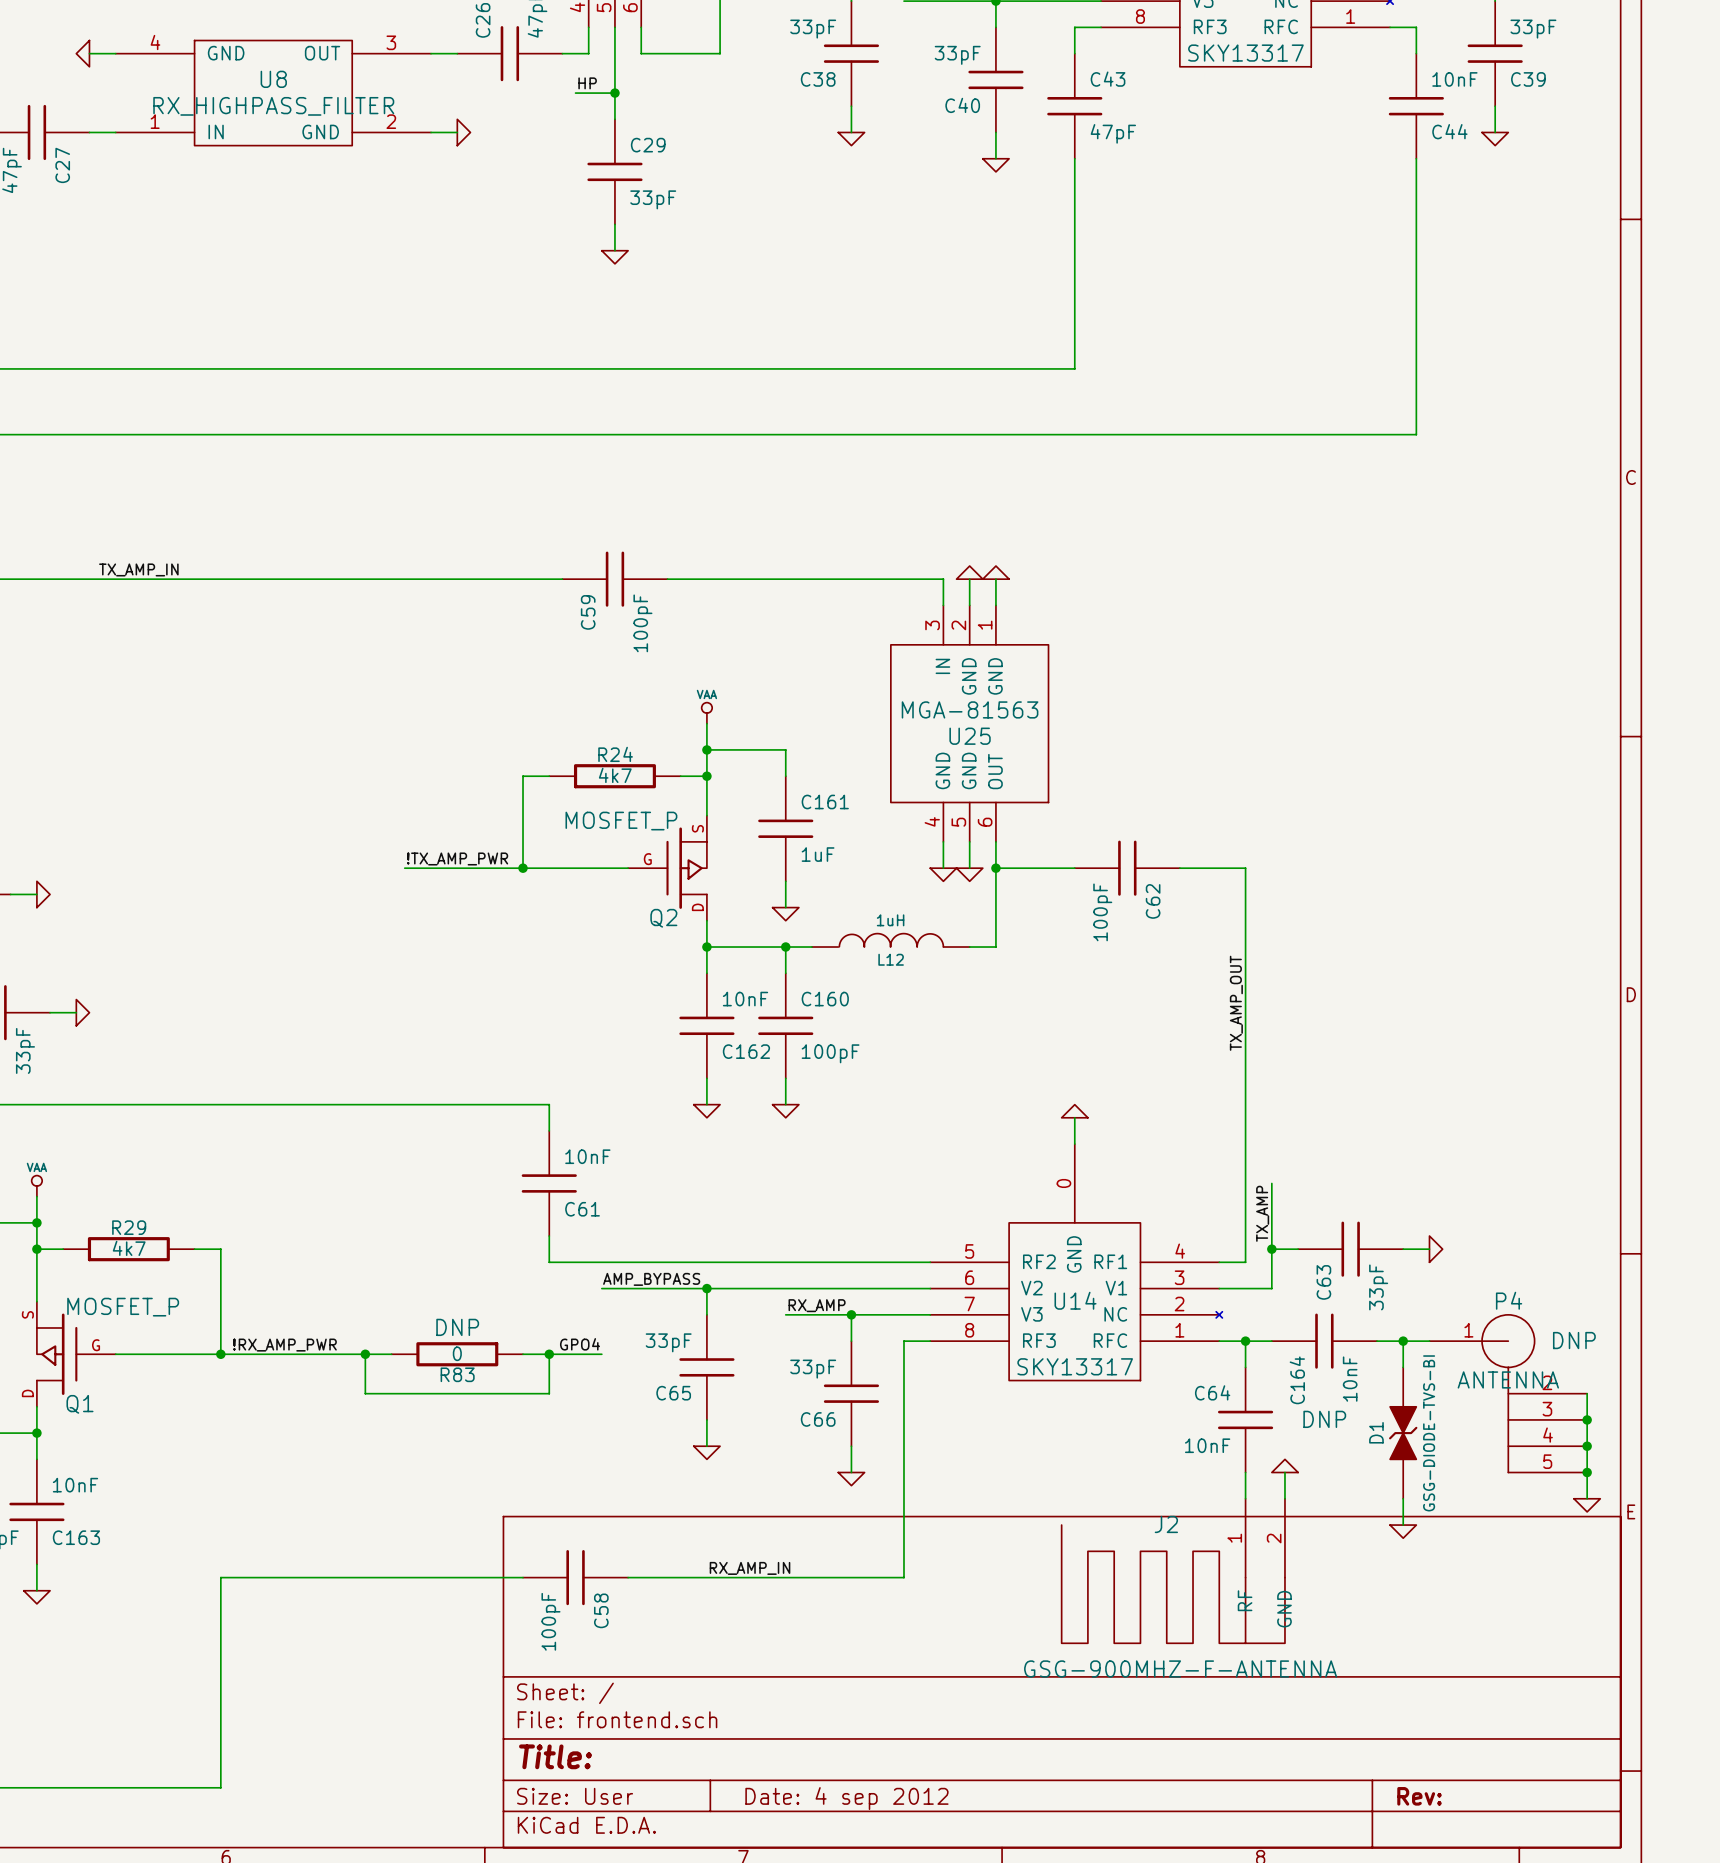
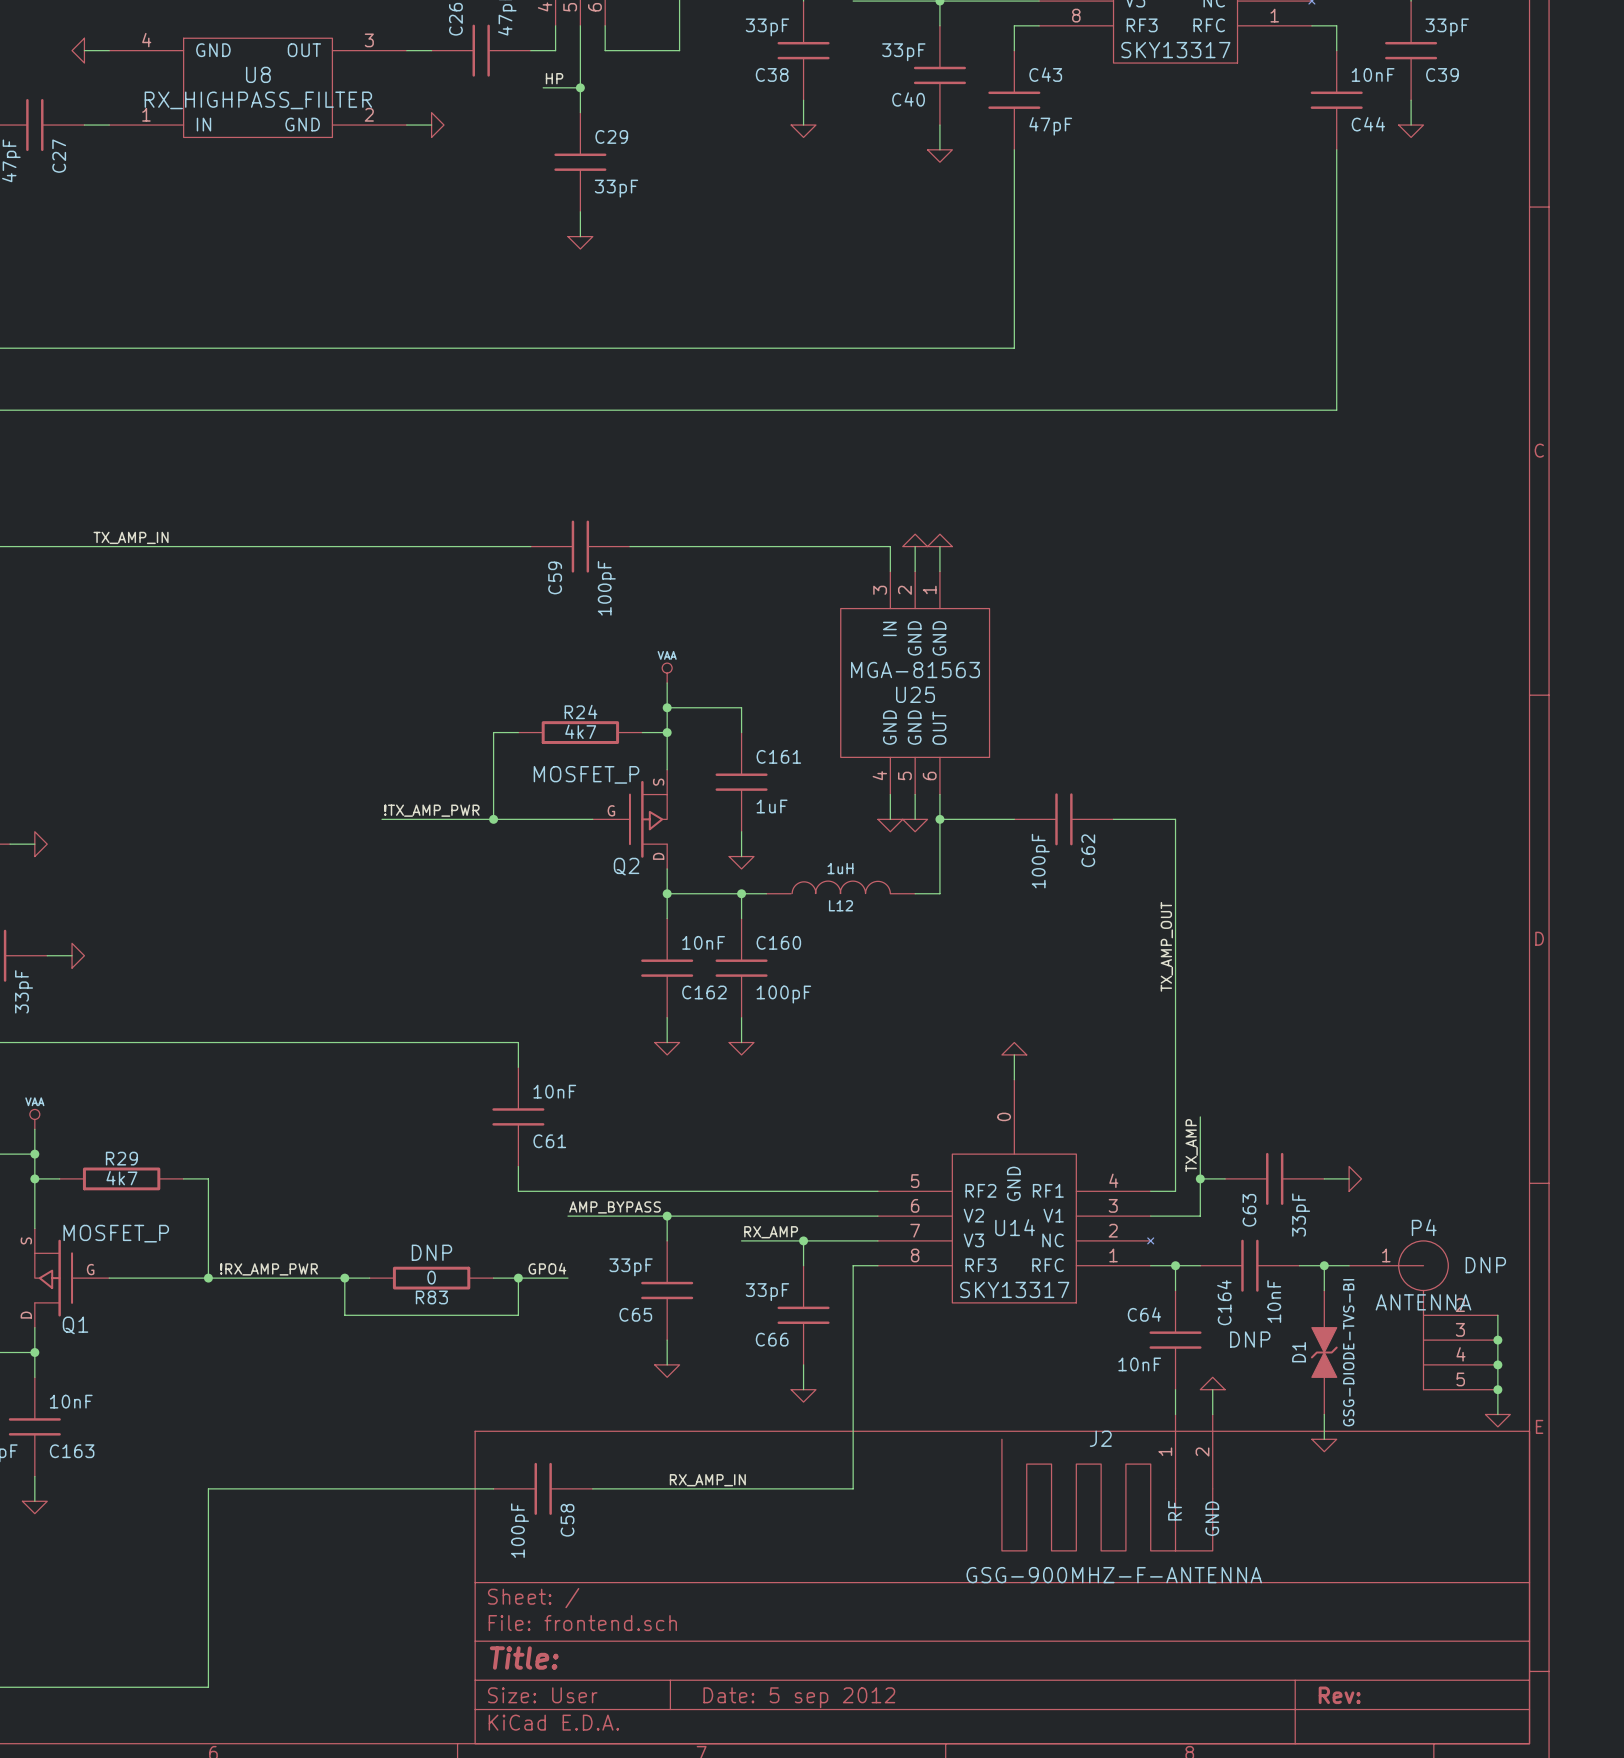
title block: Date: 4 sep 2012 (846, 1798) -> Date: 5 sep 2012 (799, 1697)

